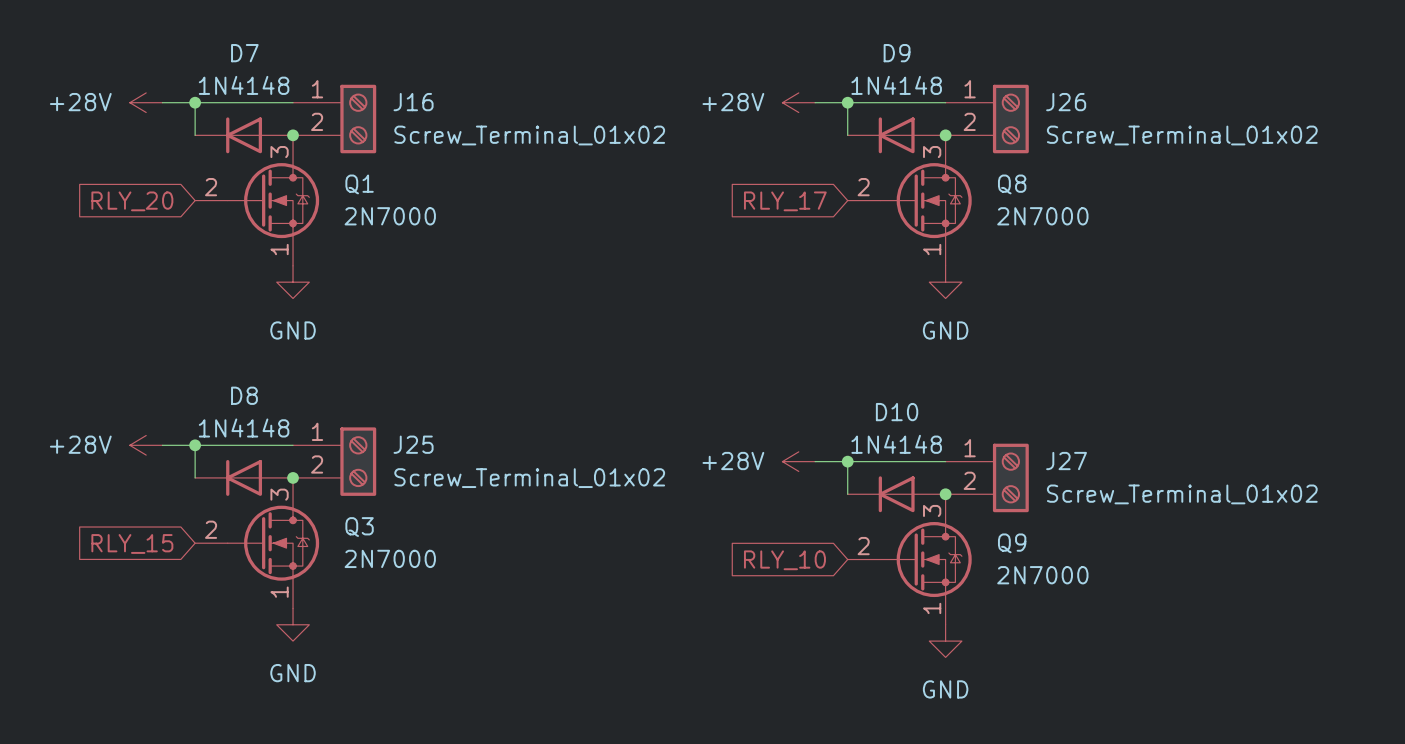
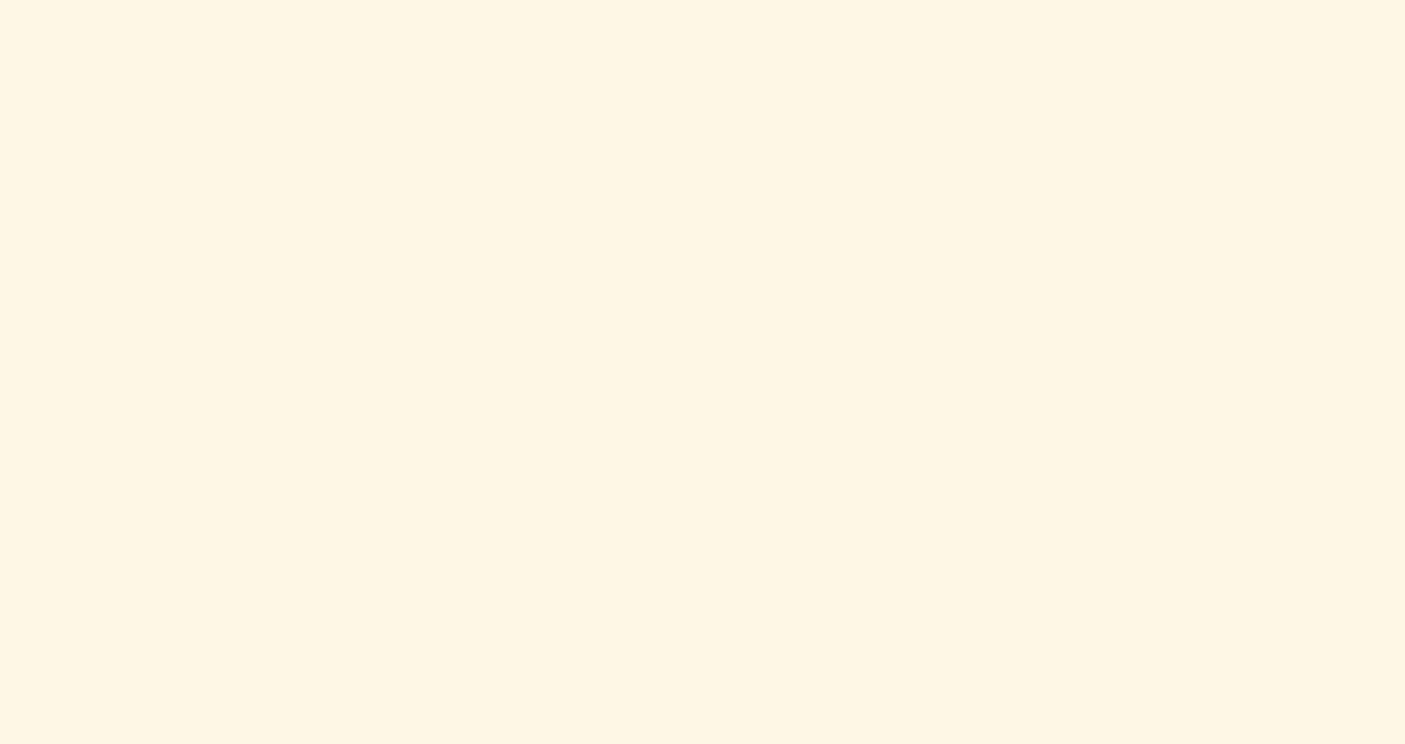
power symbol: +28V (146, 102) -> none
wire: (162, 102) (293, 102) -> none
wire: (195, 102) (195, 135) -> none
junction: (195, 102) -> none
power symbol: +28V (798, 102) -> none
wire: (815, 102) (945, 102) -> none
wire: (847, 102) (847, 135) -> none
junction: (847, 102) -> none
J16: Screw_Terminal_01x02 (334, 119) -> none
J26: Screw_Terminal_01x02 (987, 119) -> none
D7: 1N4148 (244, 135) -> none
junction: (293, 135) -> none
D9: 1N4148 (896, 135) -> none
junction: (945, 135) -> none
Q1: 2N7000 (257, 200) -> none
Q8: 2N7000 (909, 200) -> none
global label: RLY_20 (132, 201) -> none
global label: RLY_17 (785, 201) -> none
power symbol: GND (293, 282) -> none
power symbol: GND (945, 282) -> none
power symbol: +28V (146, 445) -> none
wire: (162, 445) (293, 445) -> none
wire: (195, 445) (195, 477) -> none
junction: (195, 445) -> none
J25: Screw_Terminal_01x02 (334, 461) -> none
power symbol: +28V (798, 461) -> none
wire: (815, 461) (945, 461) -> none
wire: (847, 461) (847, 494) -> none
junction: (847, 461) -> none
D8: 1N4148 (244, 477) -> none
junction: (293, 477) -> none
J27: Screw_Terminal_01x02 (987, 477) -> none
D10: 1N4148 (896, 494) -> none
junction: (945, 494) -> none
global label: RLY_15 (132, 543) -> none
Q3: 2N7000 (257, 543) -> none
Q9: 2N7000 (909, 559) -> none
global label: RLY_10 (784, 560) -> none
power symbol: GND (293, 624) -> none
power symbol: GND (945, 641) -> none

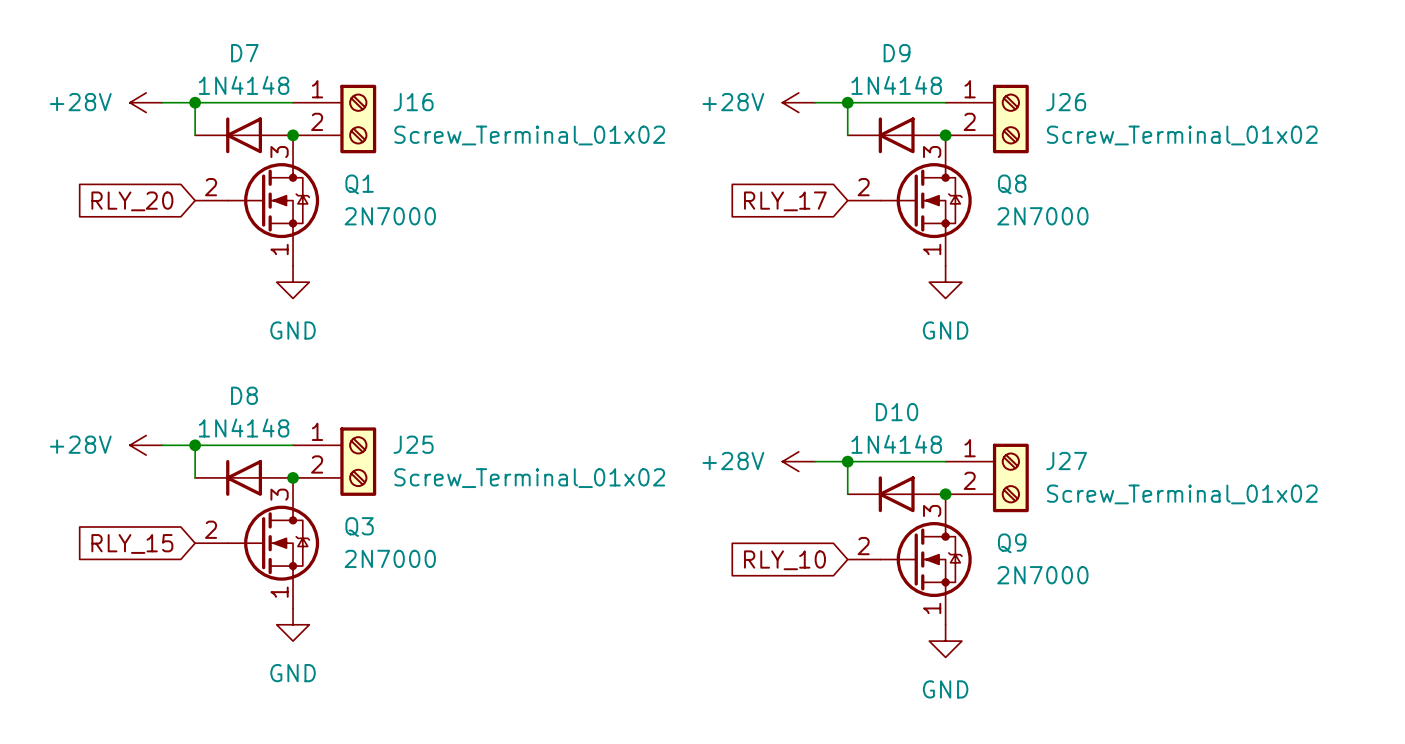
power symbol: none -> +28V (146, 102)
wire: none -> (162, 102) (293, 102)
wire: none -> (195, 102) (195, 135)
junction: none -> (195, 102)
power symbol: none -> +28V (798, 102)
wire: none -> (815, 102) (945, 102)
wire: none -> (847, 102) (847, 135)
junction: none -> (847, 102)
J16: none -> Screw_Terminal_01x02 (334, 119)
J26: none -> Screw_Terminal_01x02 (987, 119)
D7: none -> 1N4148 (244, 135)
junction: none -> (293, 135)
D9: none -> 1N4148 (896, 135)
junction: none -> (945, 135)
Q1: none -> 2N7000 (257, 200)
Q8: none -> 2N7000 (909, 200)
global label: none -> RLY_20 (132, 201)
global label: none -> RLY_17 (785, 201)
power symbol: none -> GND (293, 282)
power symbol: none -> GND (945, 282)
power symbol: none -> +28V (146, 445)
wire: none -> (162, 445) (293, 445)
wire: none -> (195, 445) (195, 477)
junction: none -> (195, 445)
J25: none -> Screw_Terminal_01x02 (334, 461)
power symbol: none -> +28V (798, 461)
wire: none -> (815, 461) (945, 461)
wire: none -> (847, 461) (847, 494)
junction: none -> (847, 461)
D8: none -> 1N4148 (244, 477)
junction: none -> (293, 477)
J27: none -> Screw_Terminal_01x02 (987, 477)
D10: none -> 1N4148 (896, 494)
junction: none -> (945, 494)
global label: none -> RLY_15 (132, 543)
Q3: none -> 2N7000 (257, 543)
Q9: none -> 2N7000 (909, 559)
global label: none -> RLY_10 (784, 560)
power symbol: none -> GND (293, 624)
power symbol: none -> GND (945, 641)

